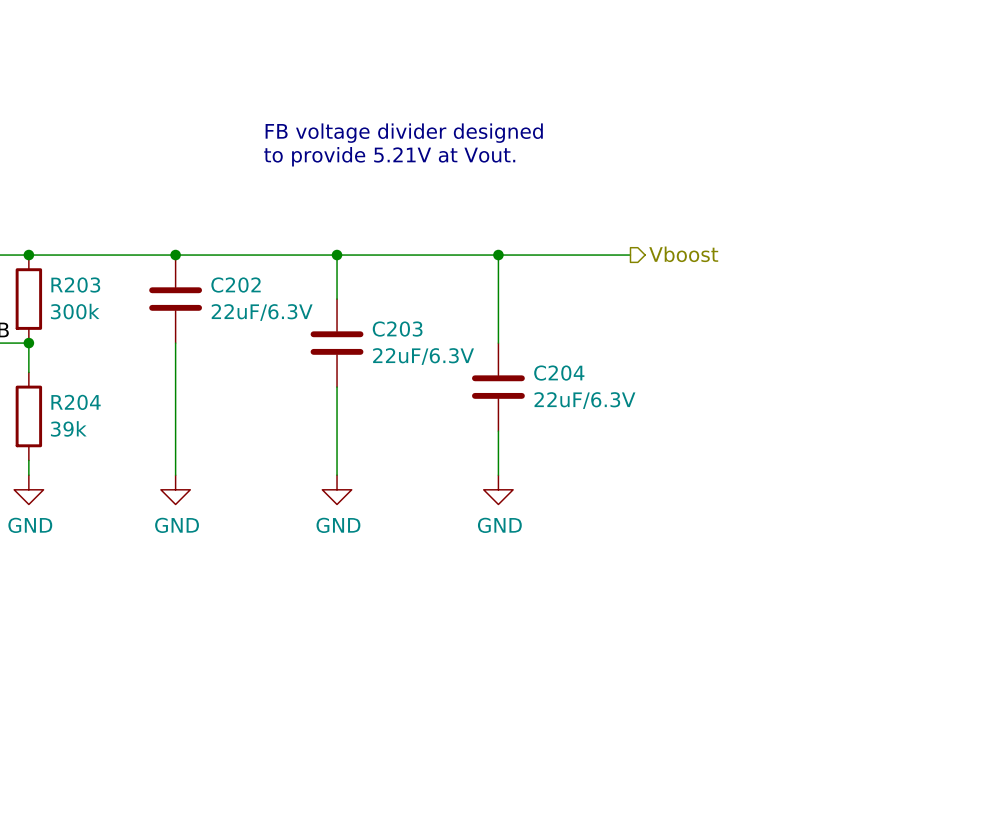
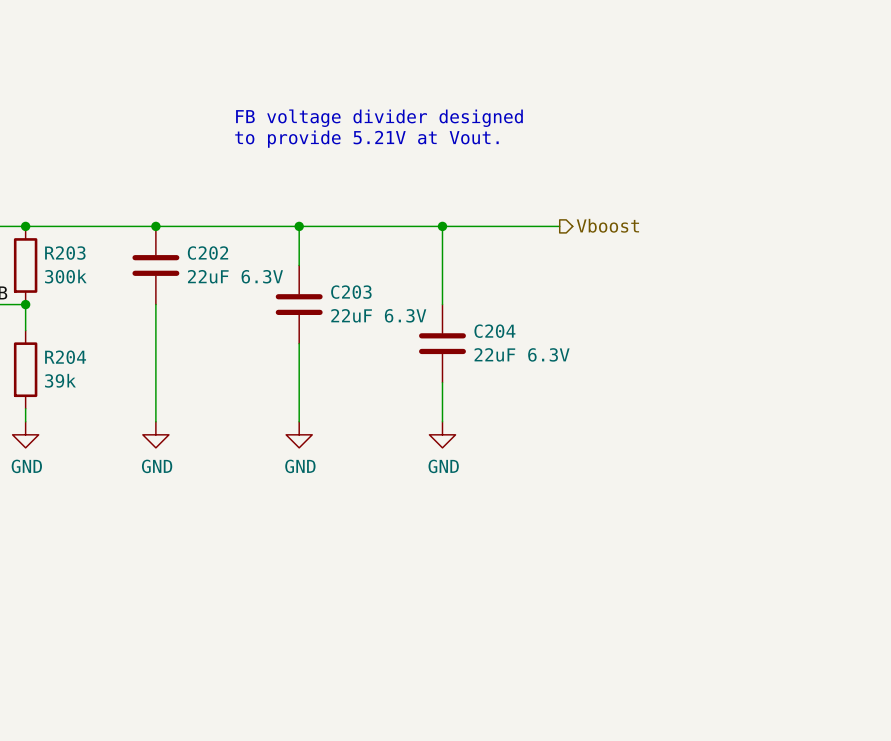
C202 value: 22uF/6.3V (262, 312) -> 22uF 6.3V (235, 276)
C203 value: 22uF/6.3V (423, 356) -> 22uF 6.3V (378, 315)
C204 value: 22uF/6.3V (584, 400) -> 22uF 6.3V (522, 354)

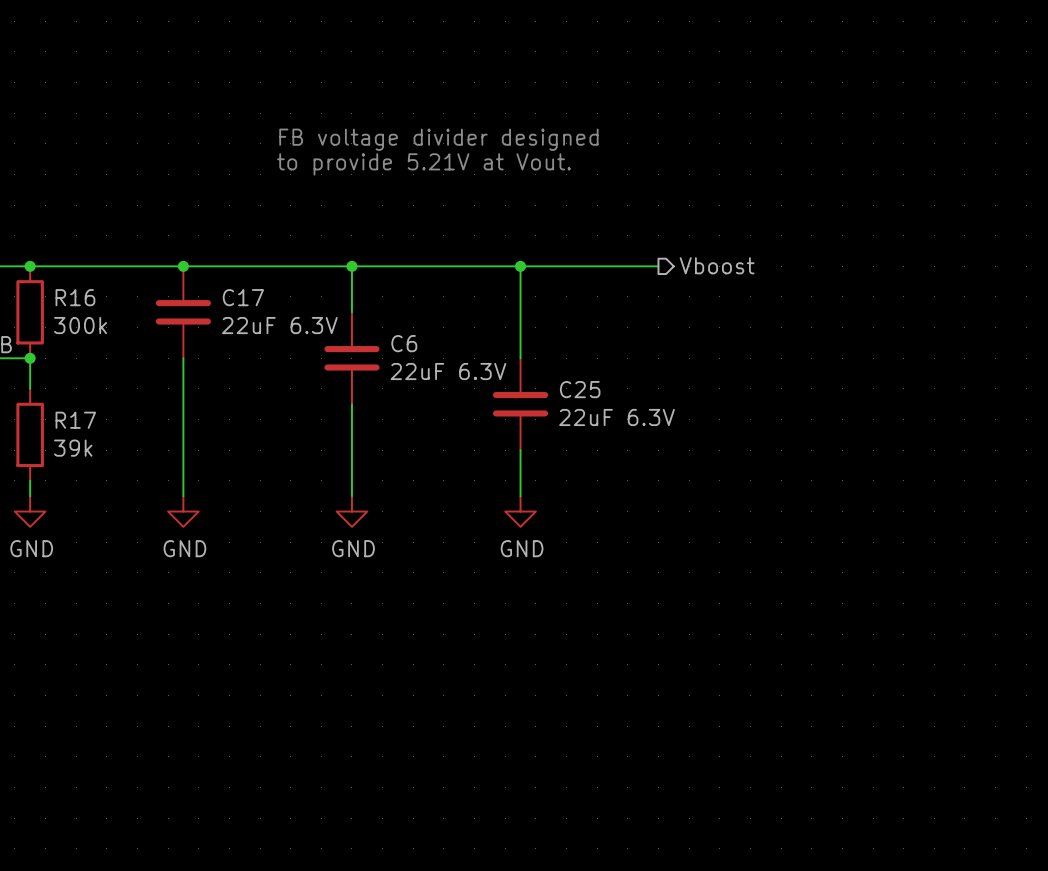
R203 name: R203 (65, 253) -> R16 (75, 297)
C202 name: C202 (208, 253) -> C17 (243, 297)
C203 name: C203 (351, 292) -> C6 (404, 343)
C204 name: C204 (494, 331) -> C25 (580, 389)
R204 name: R204 (65, 357) -> R17 (75, 420)

